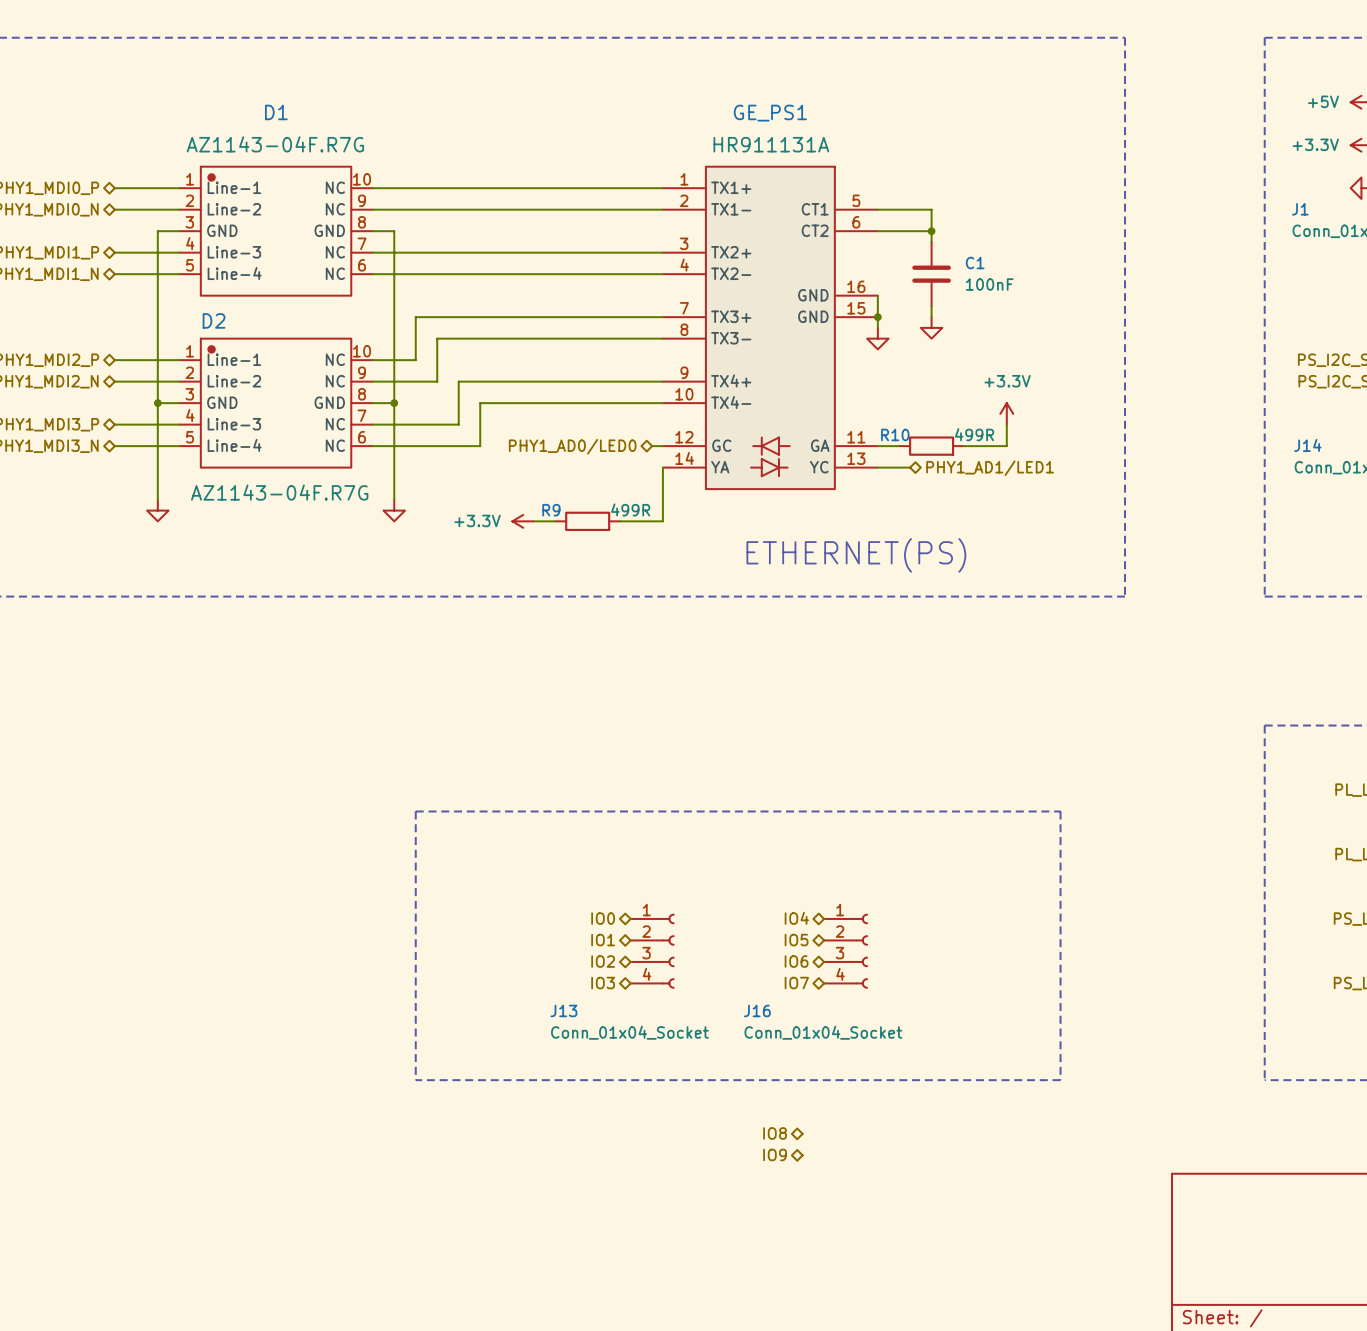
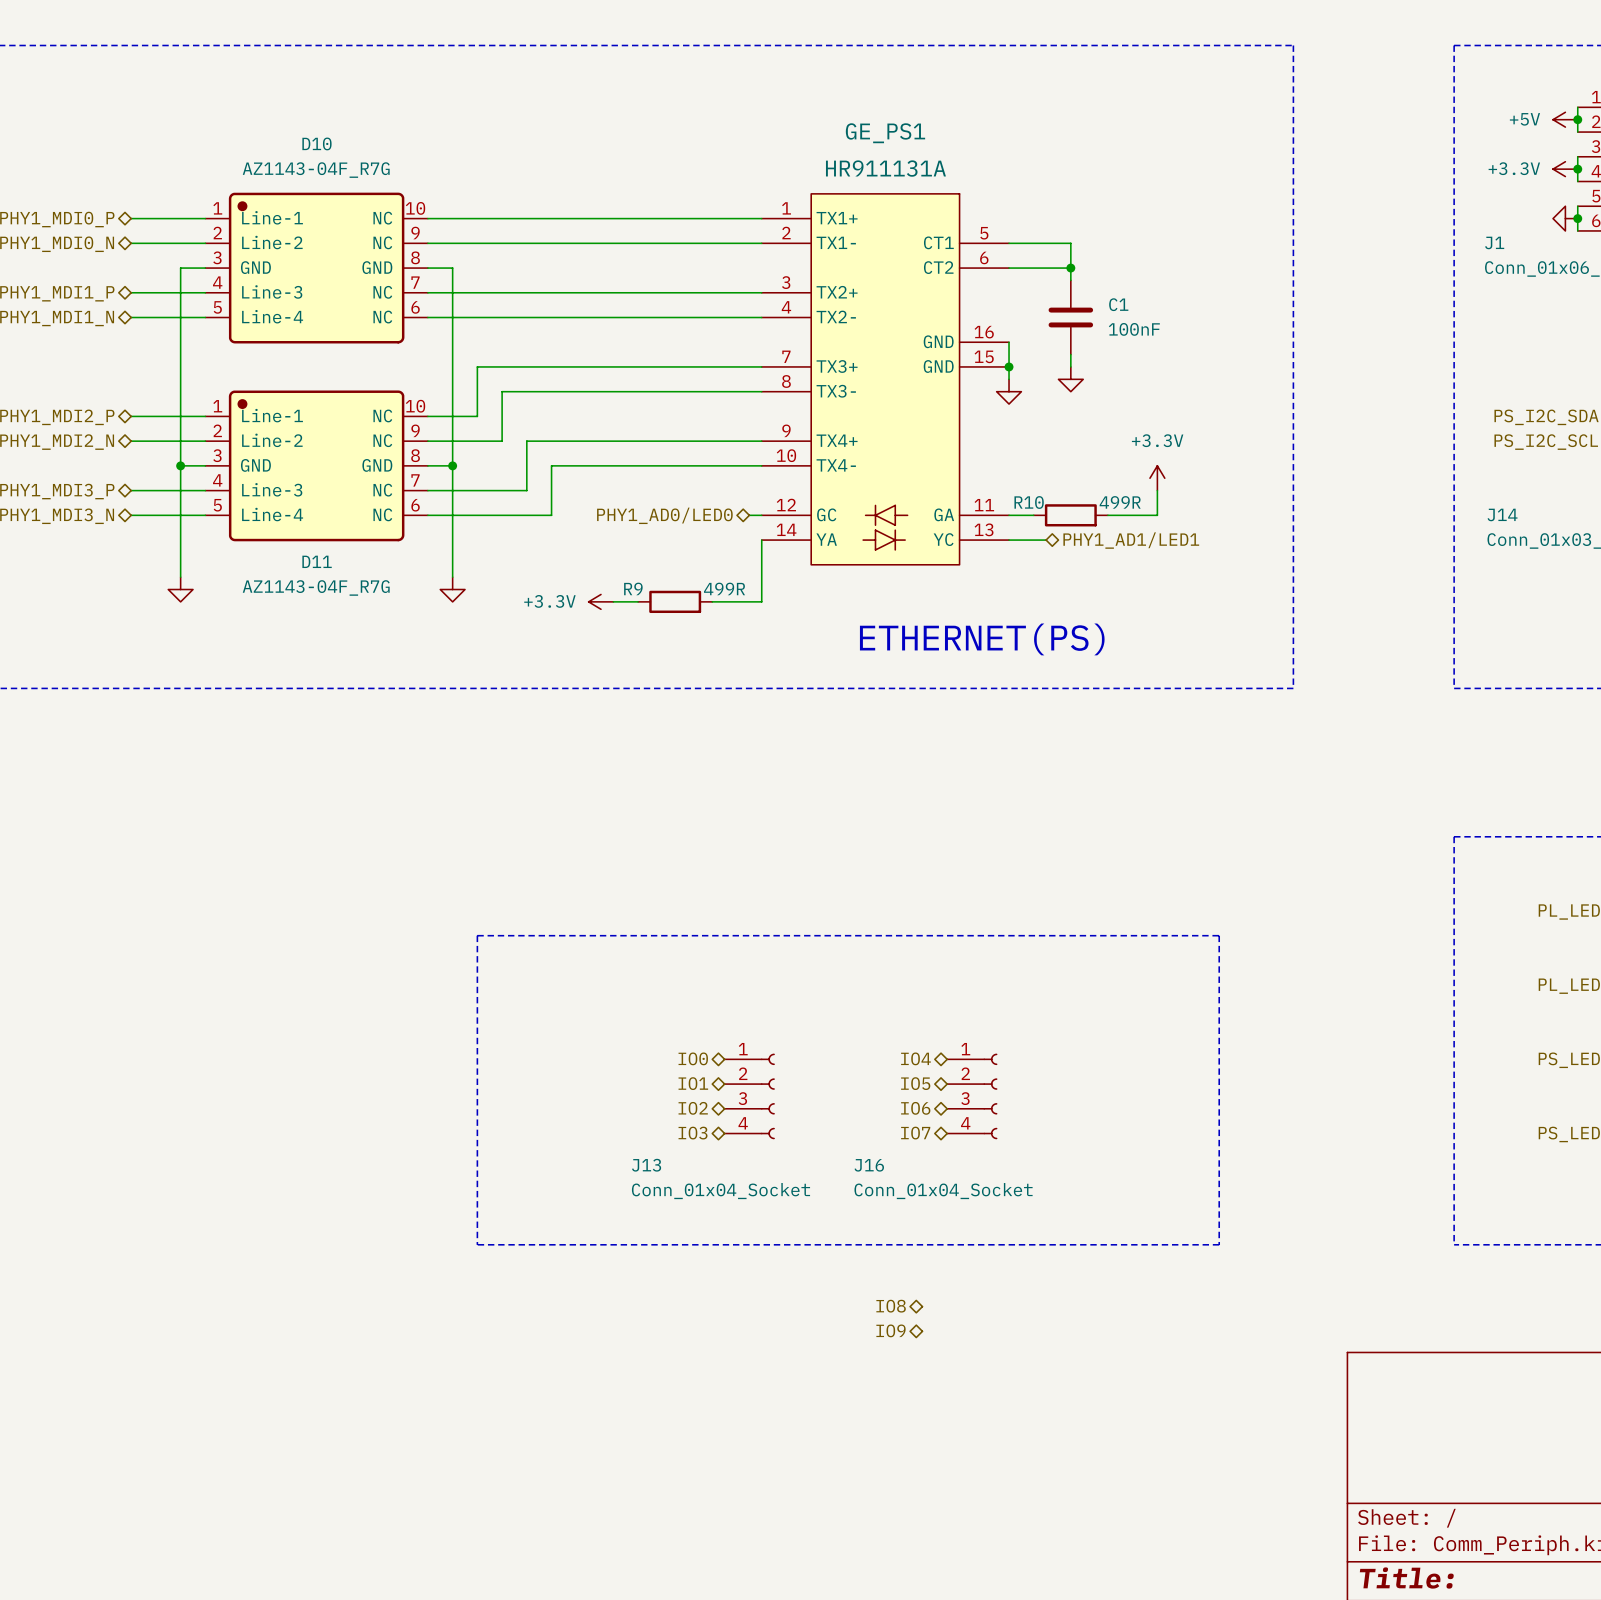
D1: AZ1143-04F.R7G (276, 231) -> none
D10: none -> AZ1143-04F_R7G (316, 268)
D2: AZ1143-04F.R7G (276, 403) -> none
D11: none -> AZ1143-04F_R7G (316, 465)

